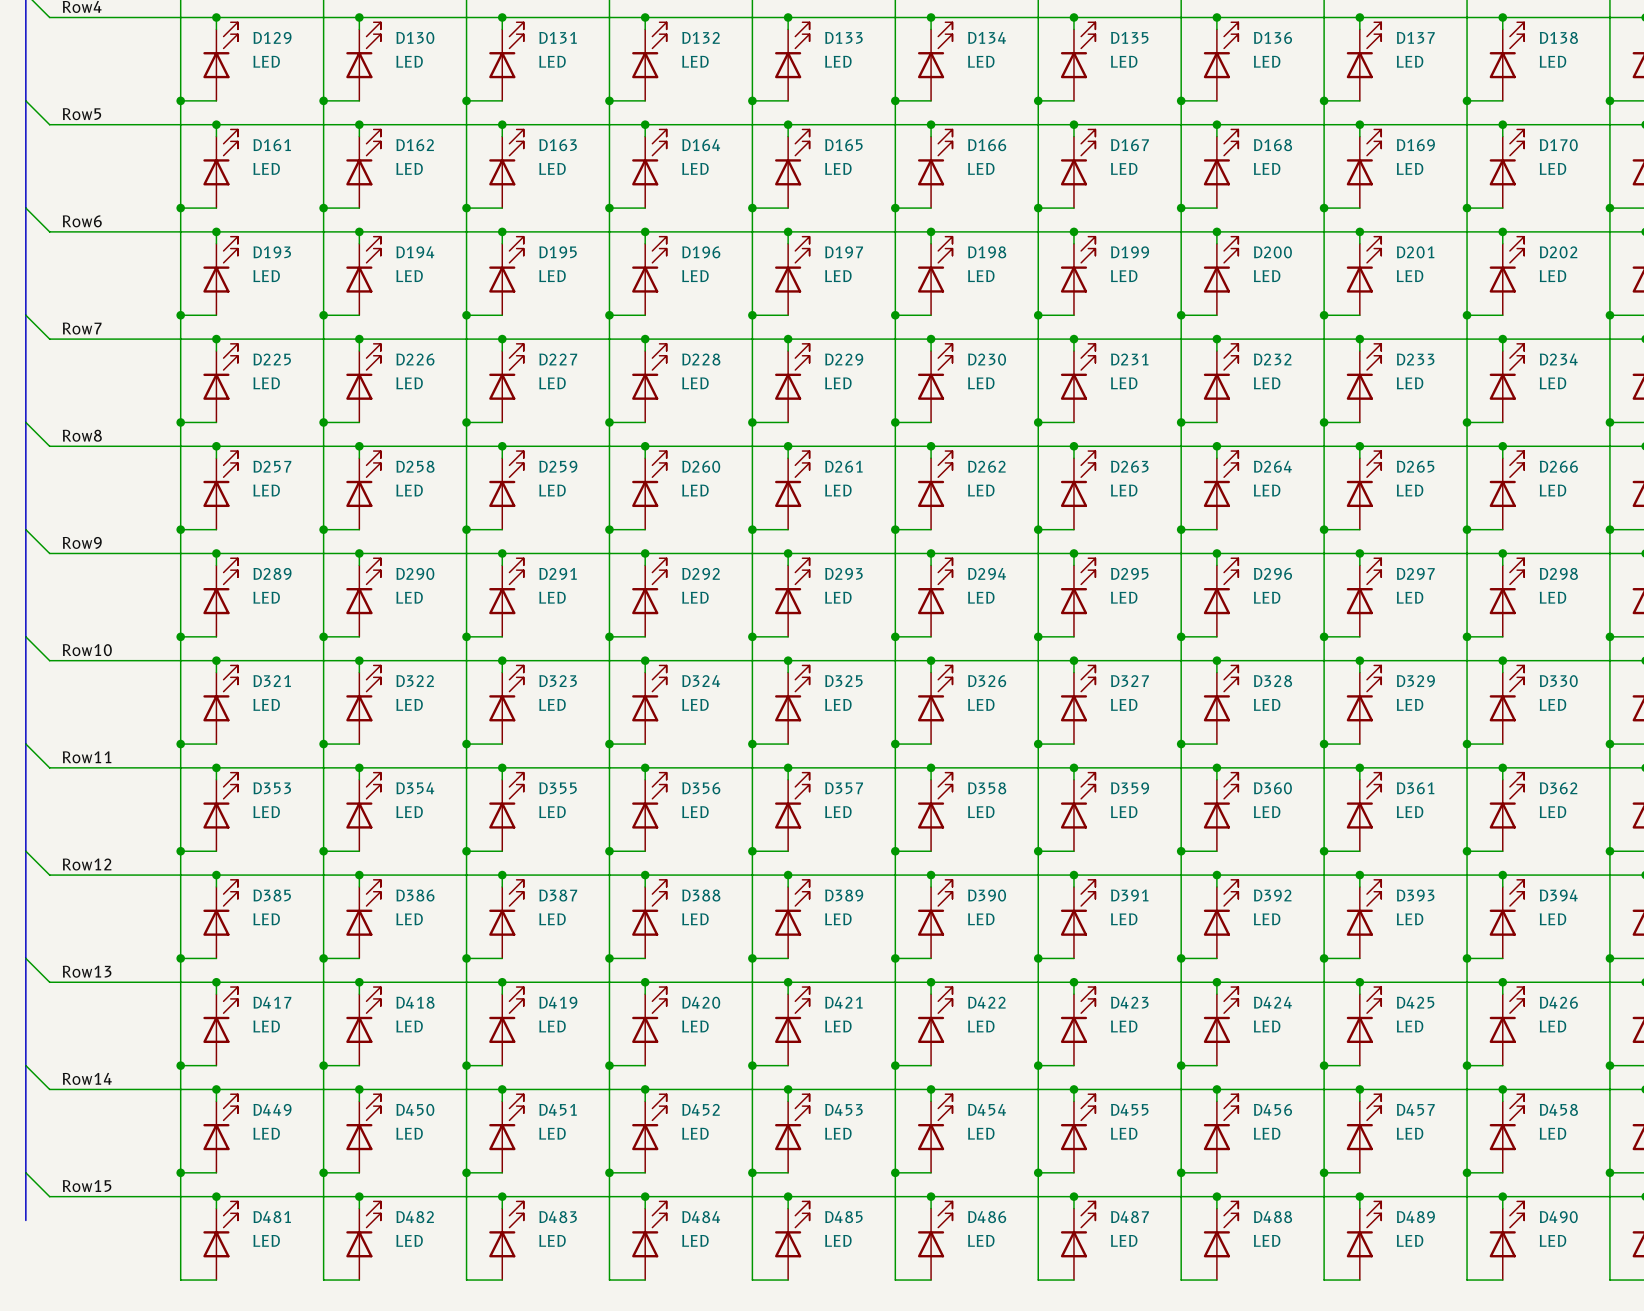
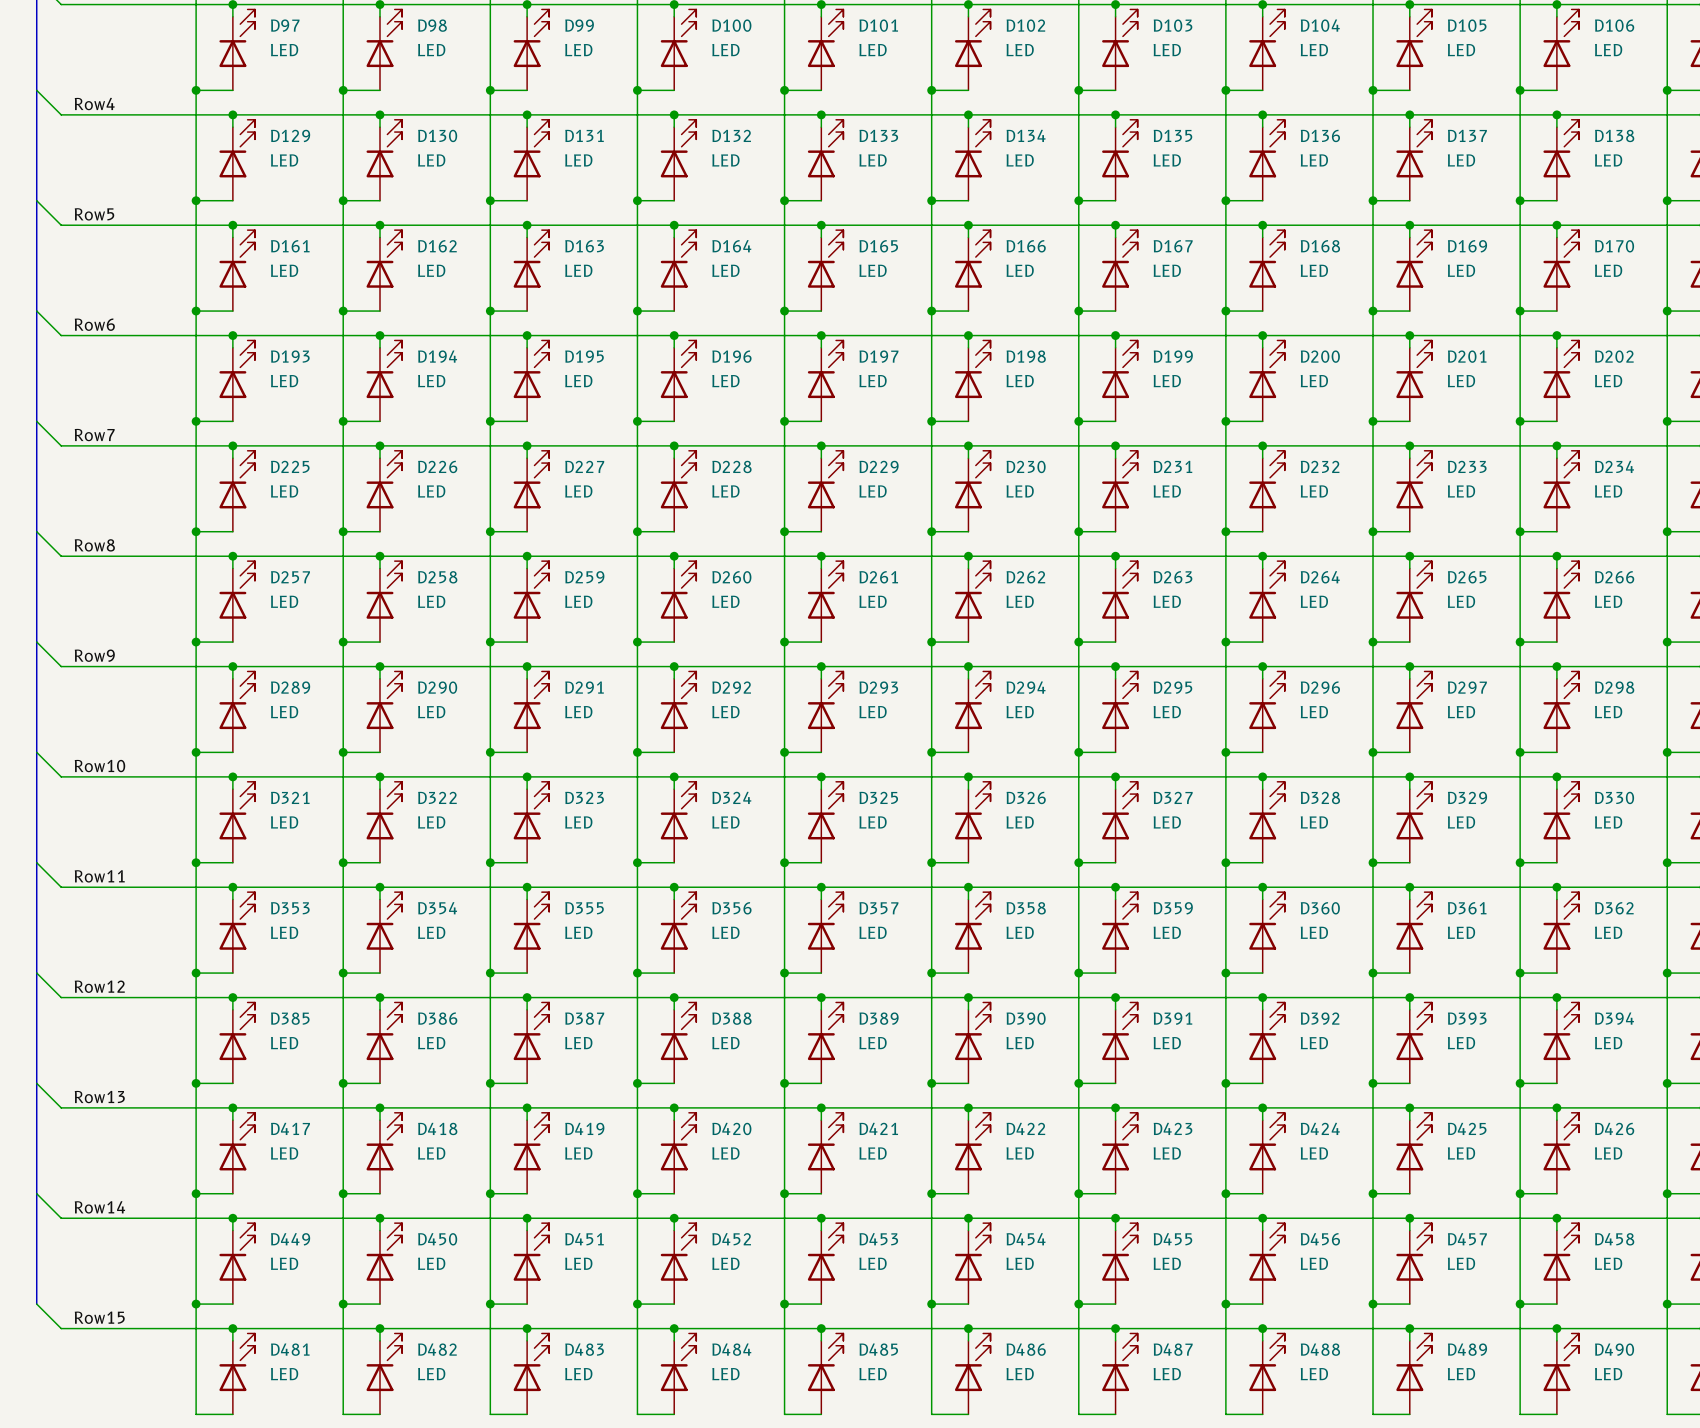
bus: (25, 1172) (25, 1220) -> none

